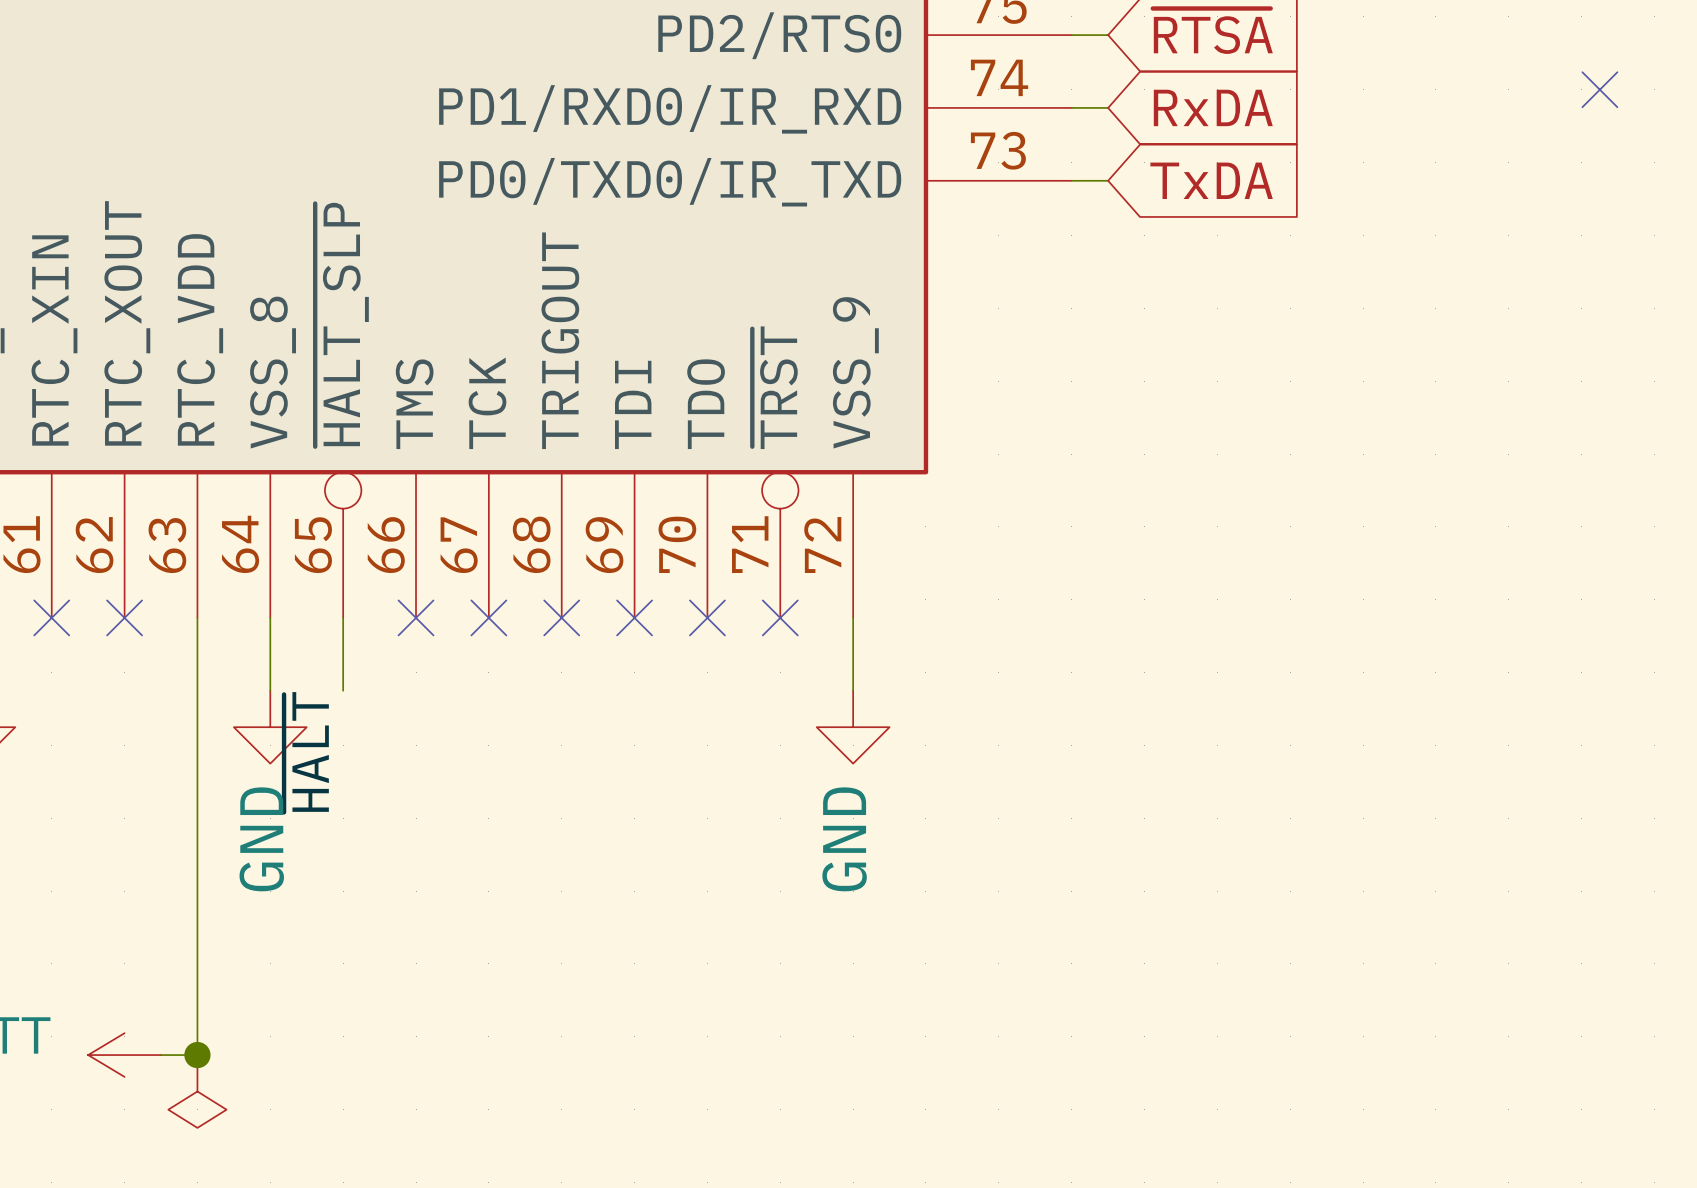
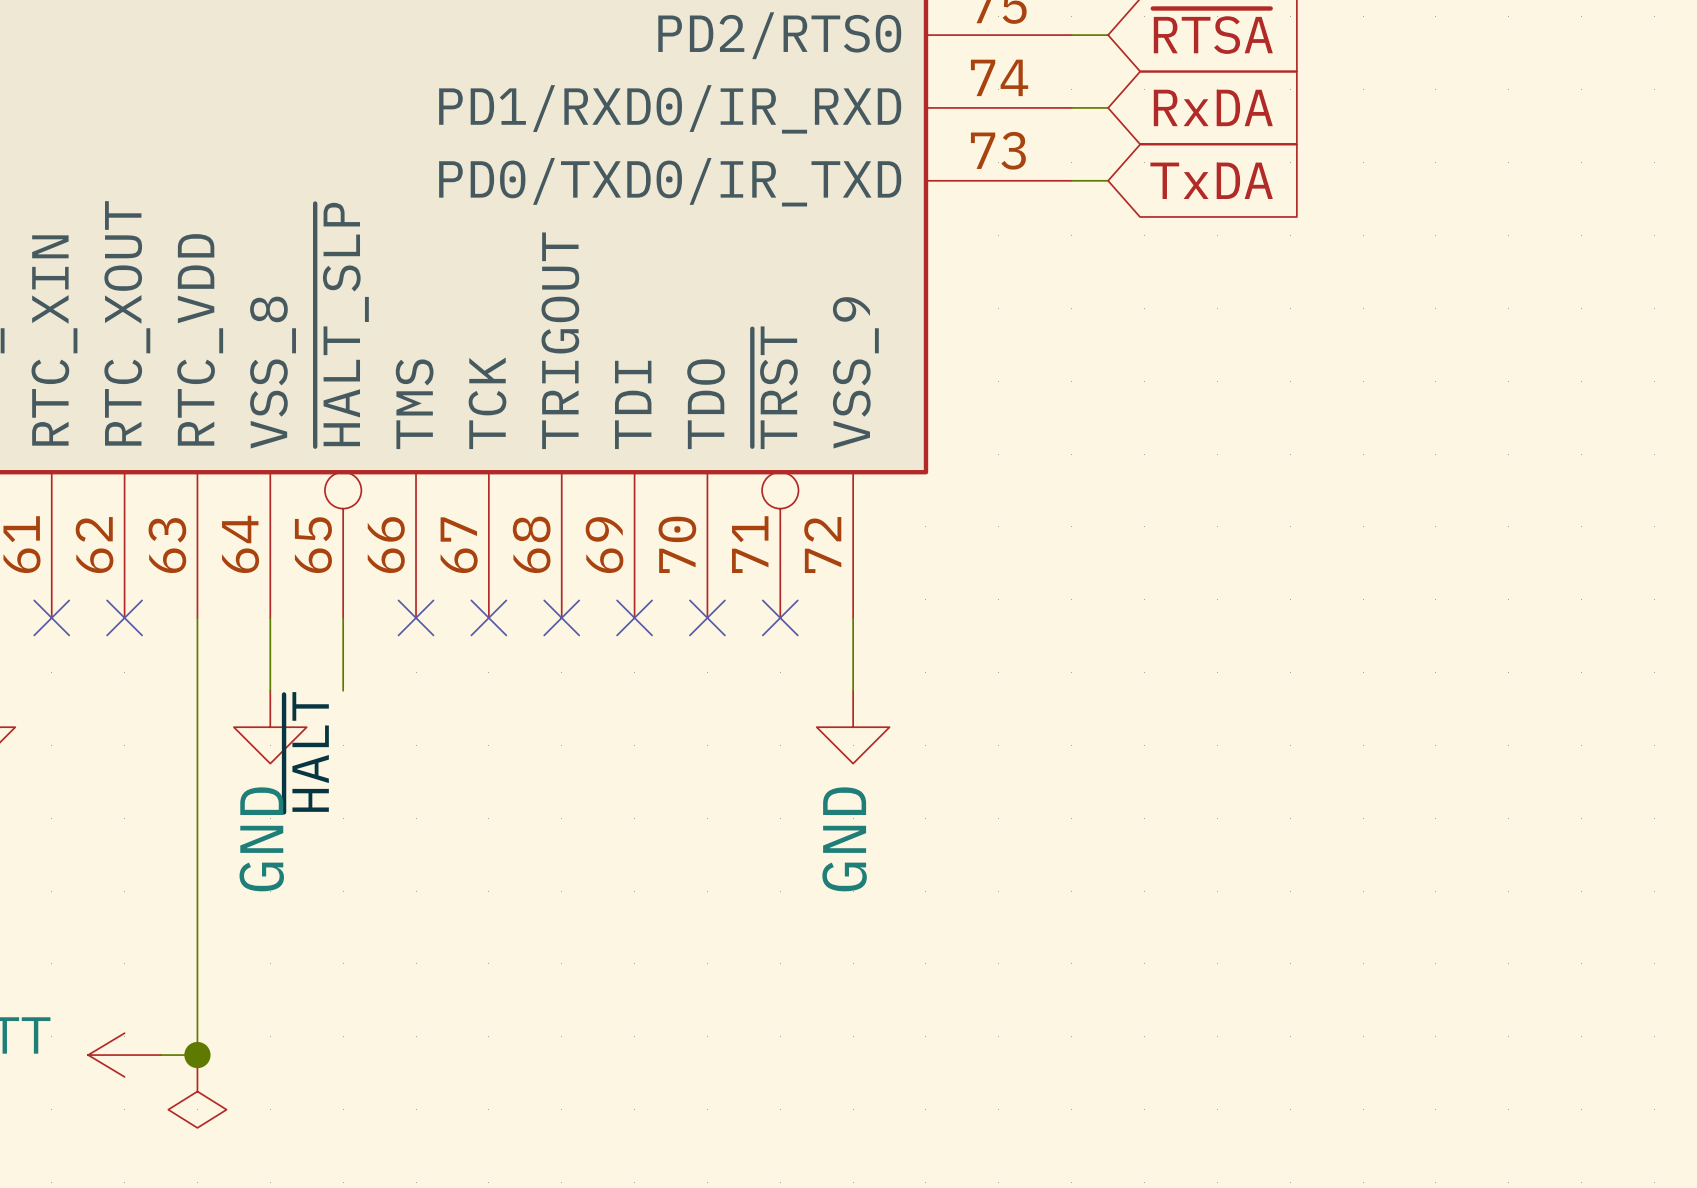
no-connect mark: (1599, 89) -> none

